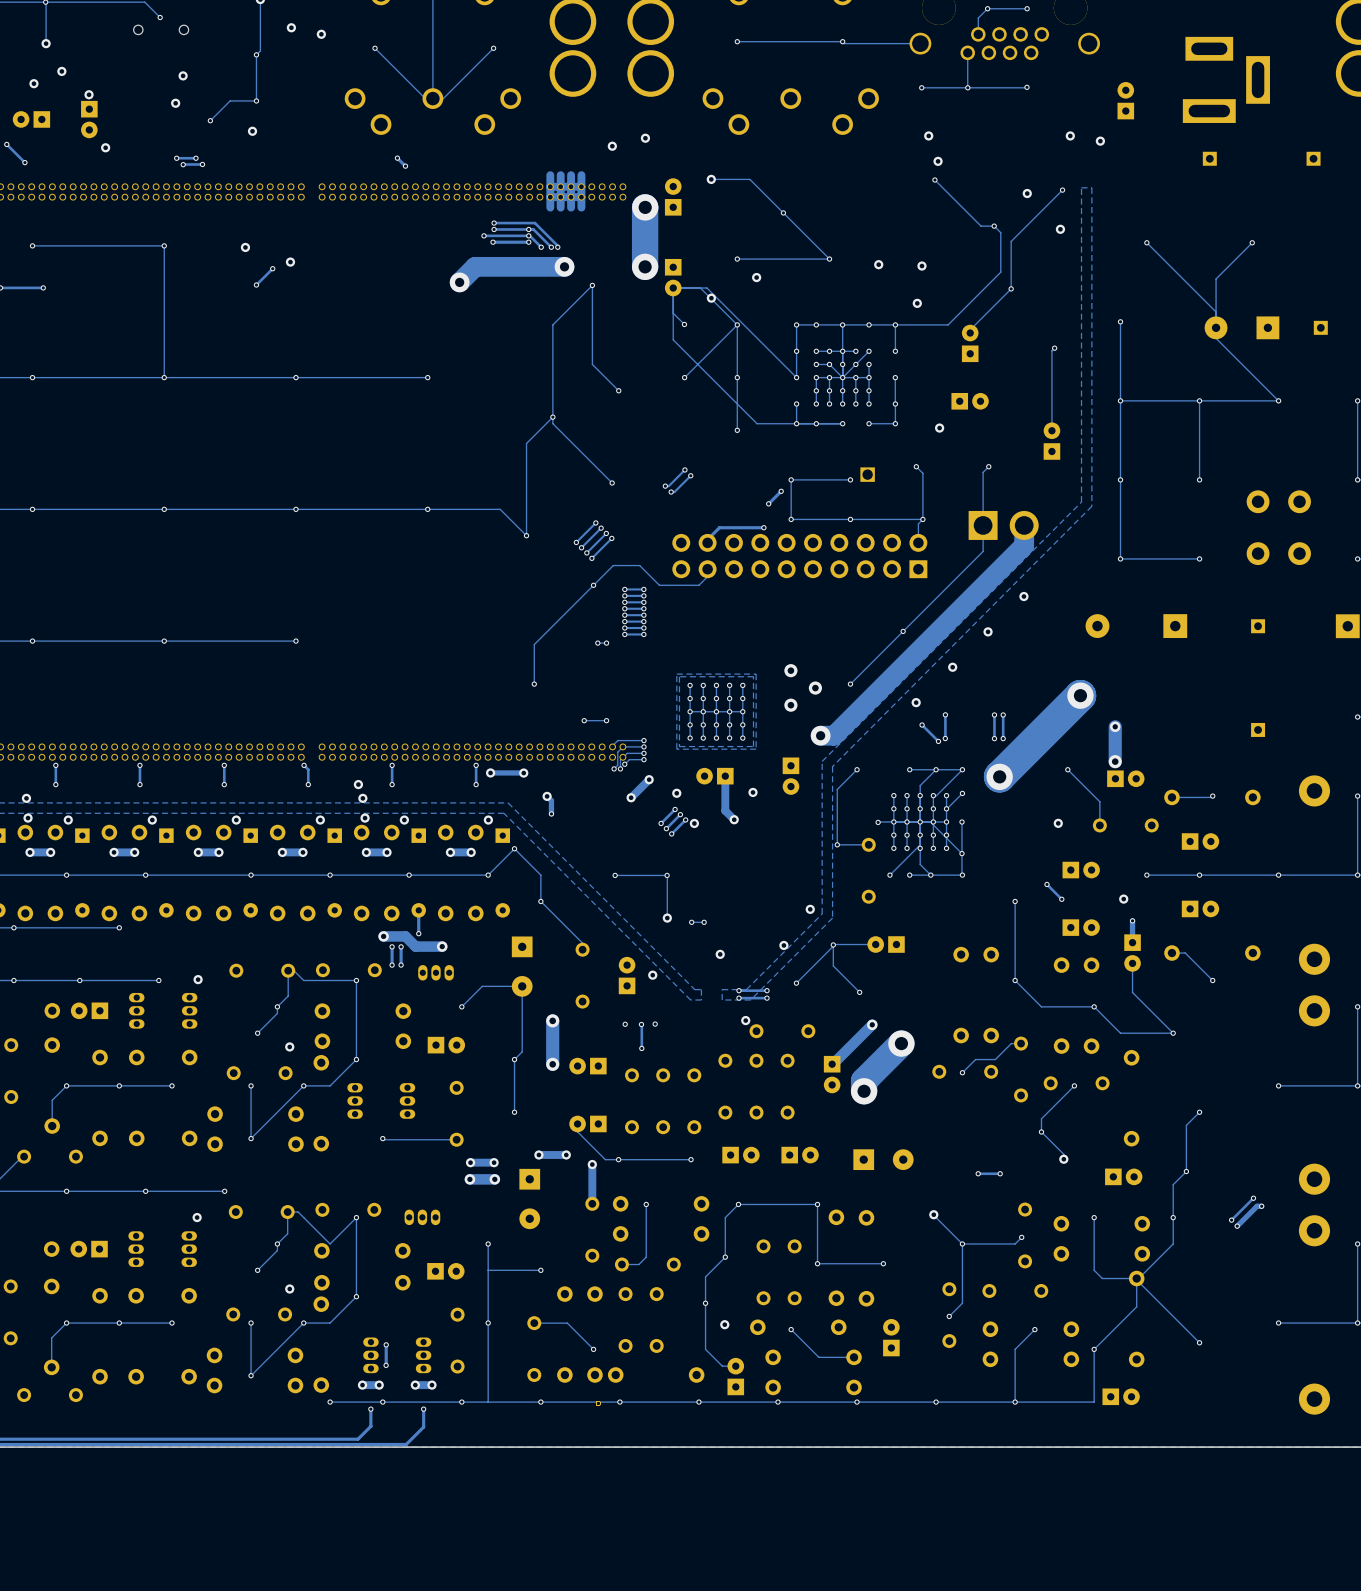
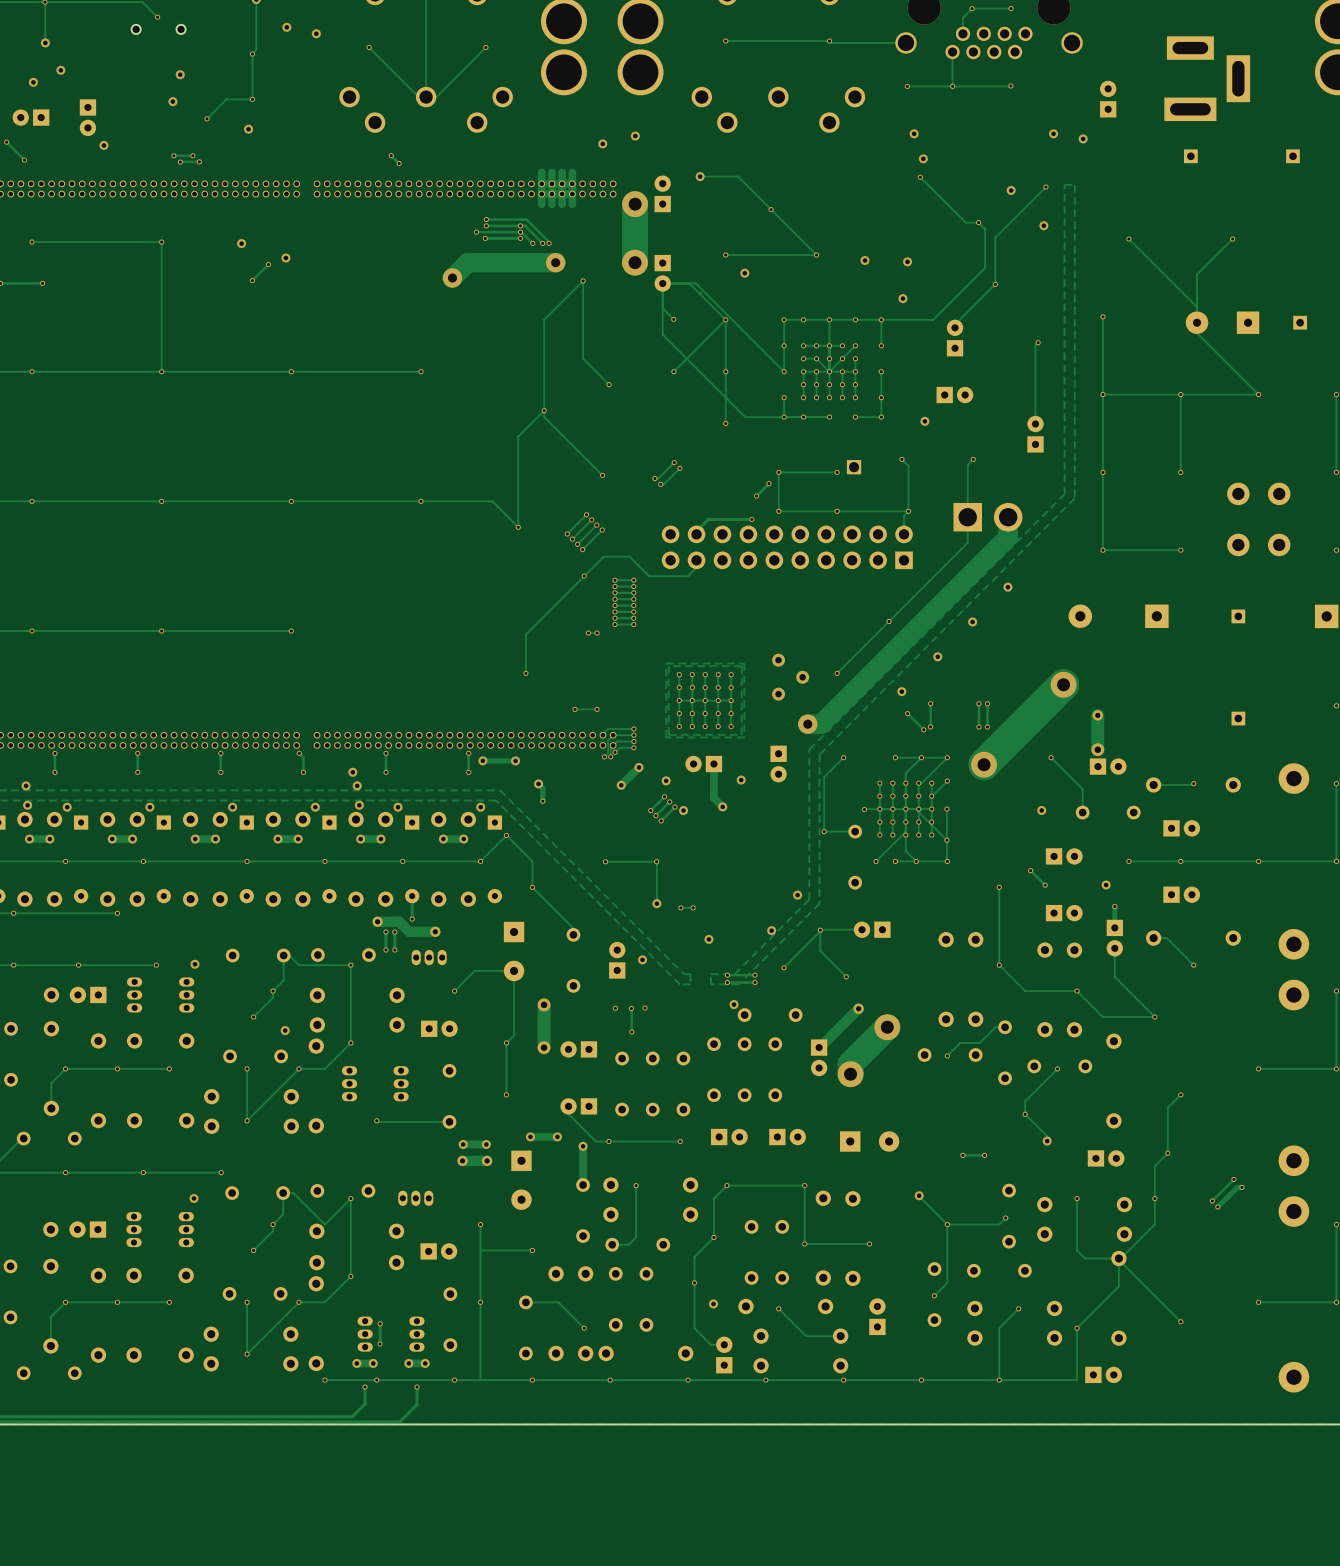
via: (89, 94) -> none
via: (711, 298) -> none
via: (289, 1289) -> none
part: (598, 1403) -> none

